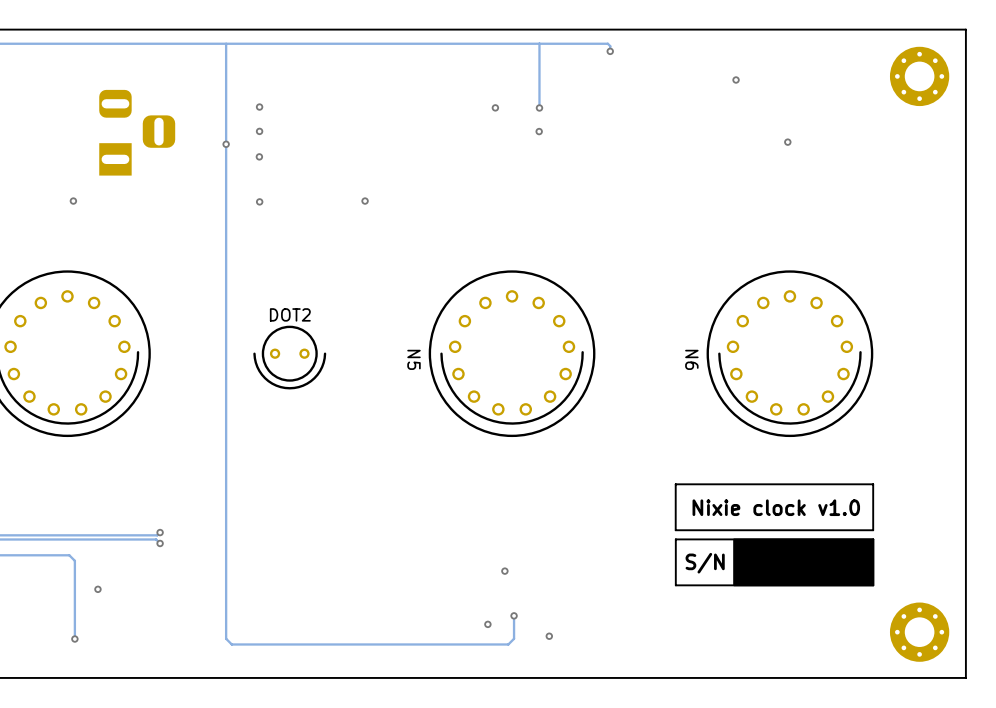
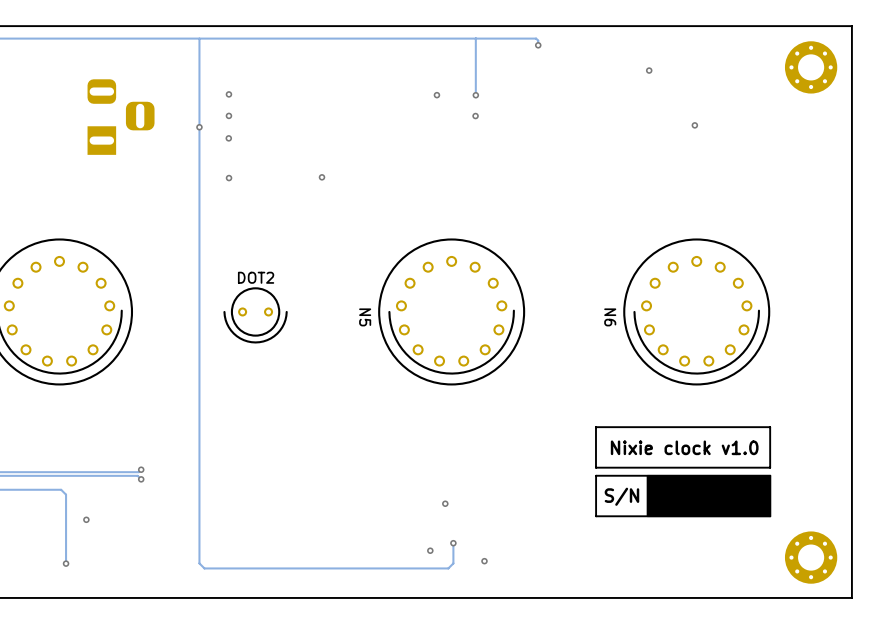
via: (73, 201) -> none

